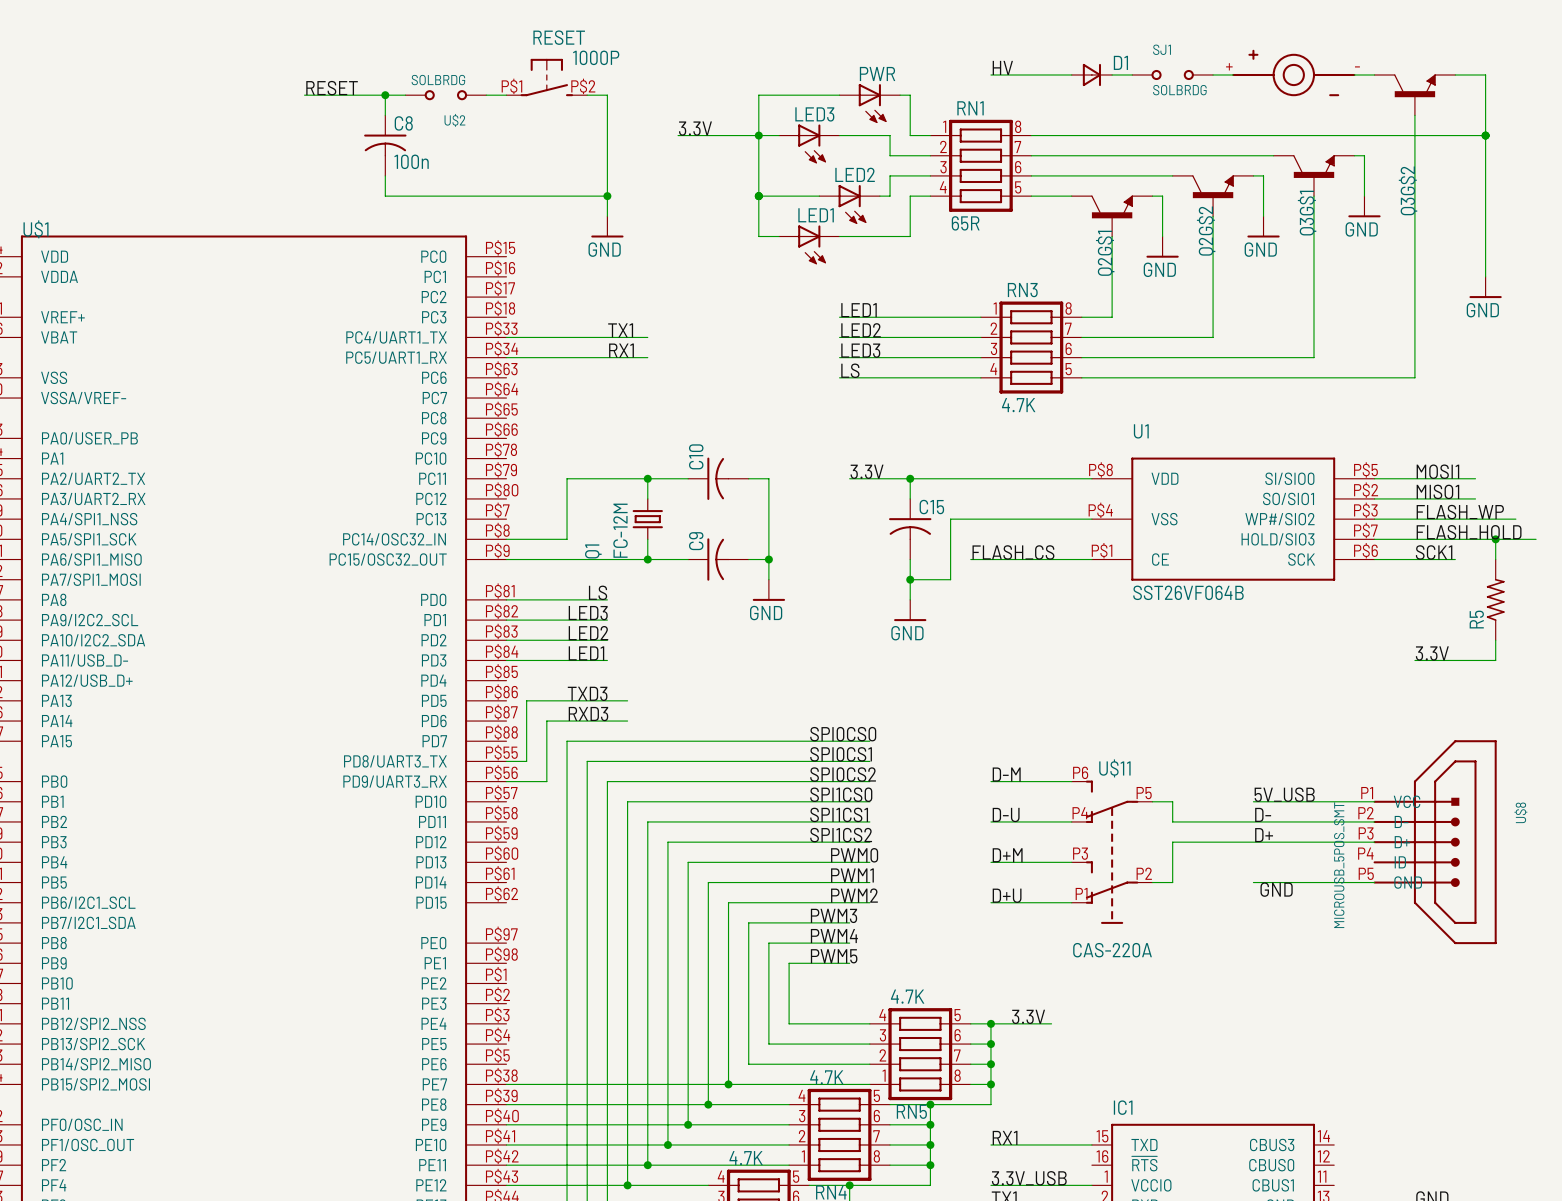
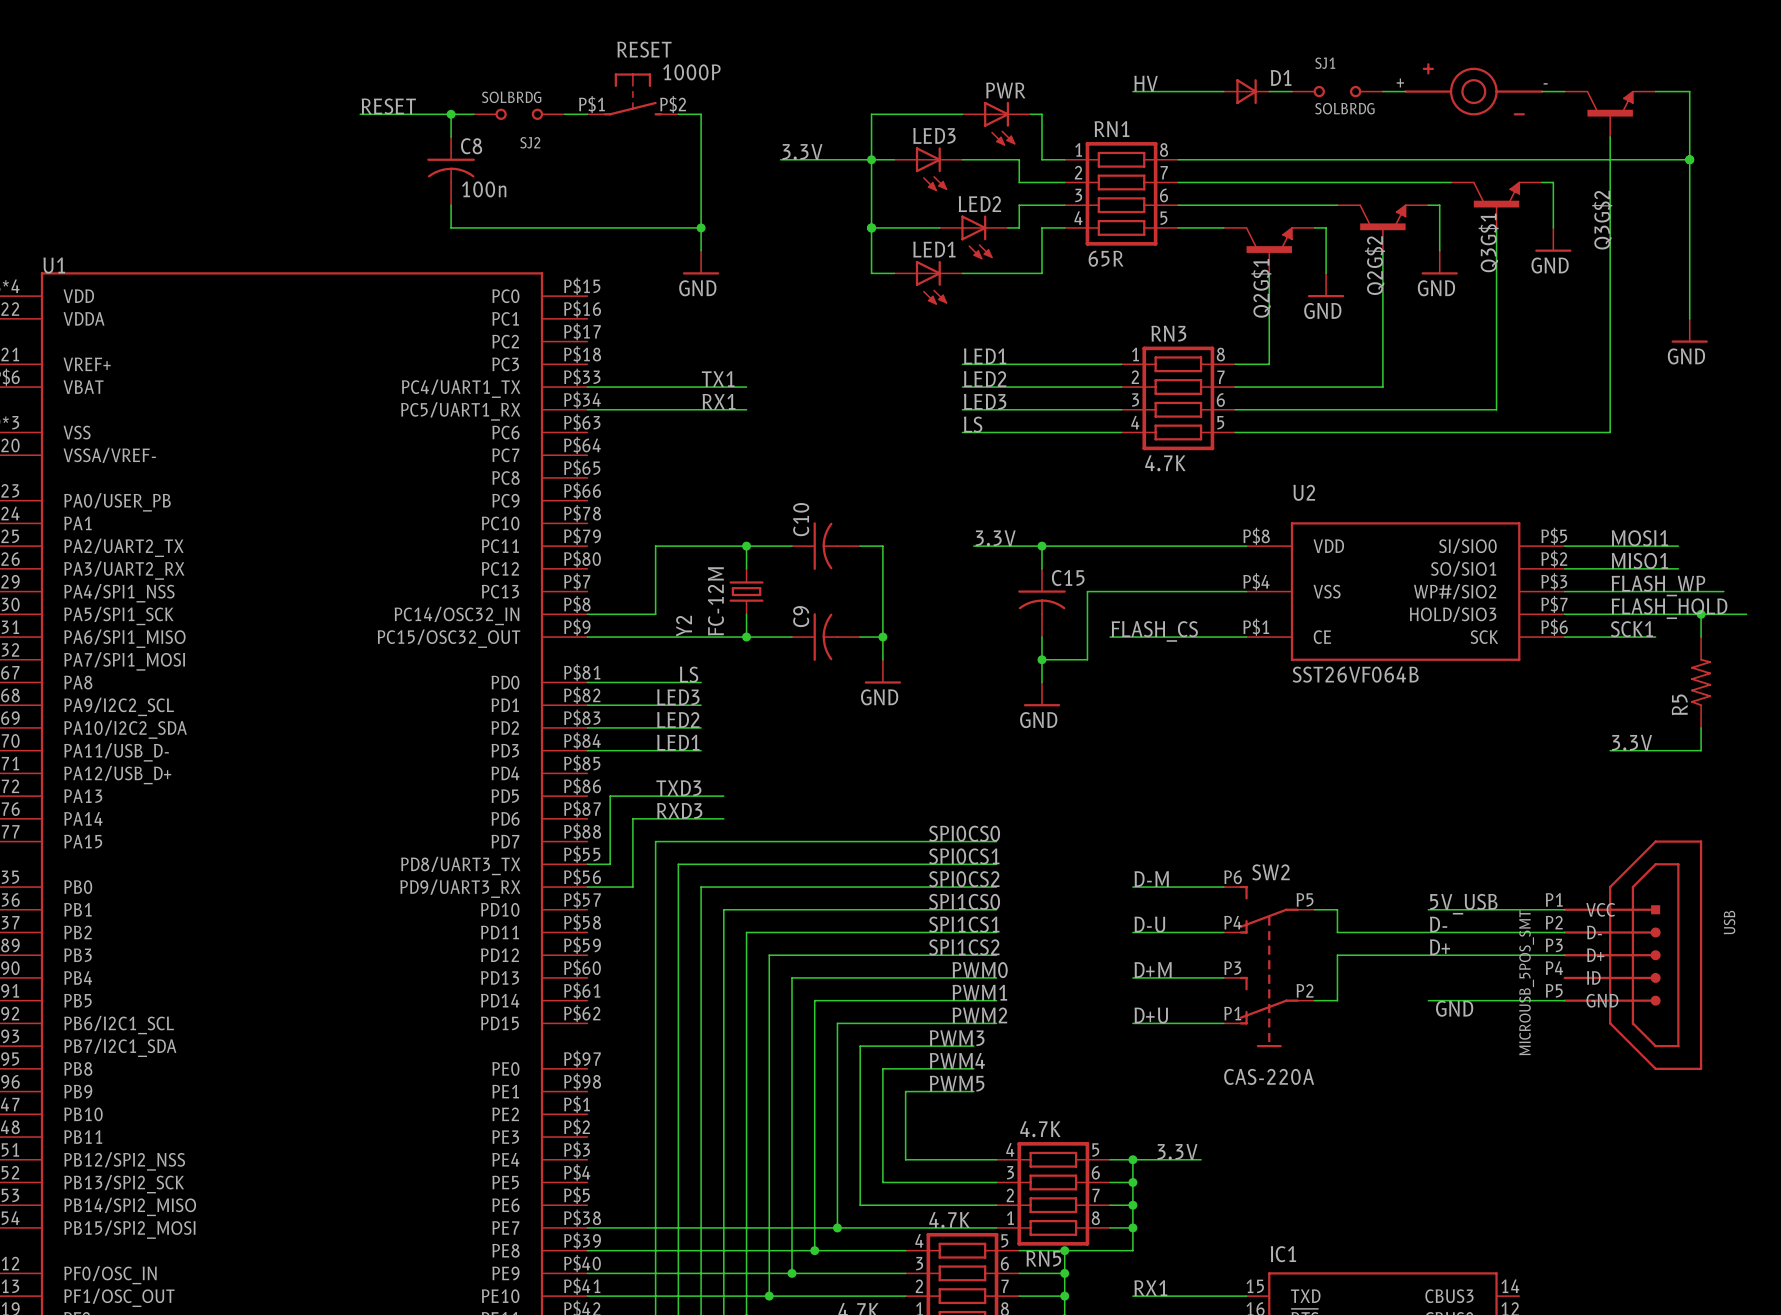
U$2 name: U$2 (454, 120) -> SJ2 (530, 142)
U$1 name: U$1 (36, 229) -> U1 (54, 265)
U1 name: U1 (1141, 431) -> U2 (1304, 492)
Q1 name: Q1 (593, 551) -> Y2 (684, 626)
U$11 name: U$11 (1114, 768) -> SW2 (1270, 872)
U$8 name: U$8 (1520, 812) -> USB (1729, 922)

